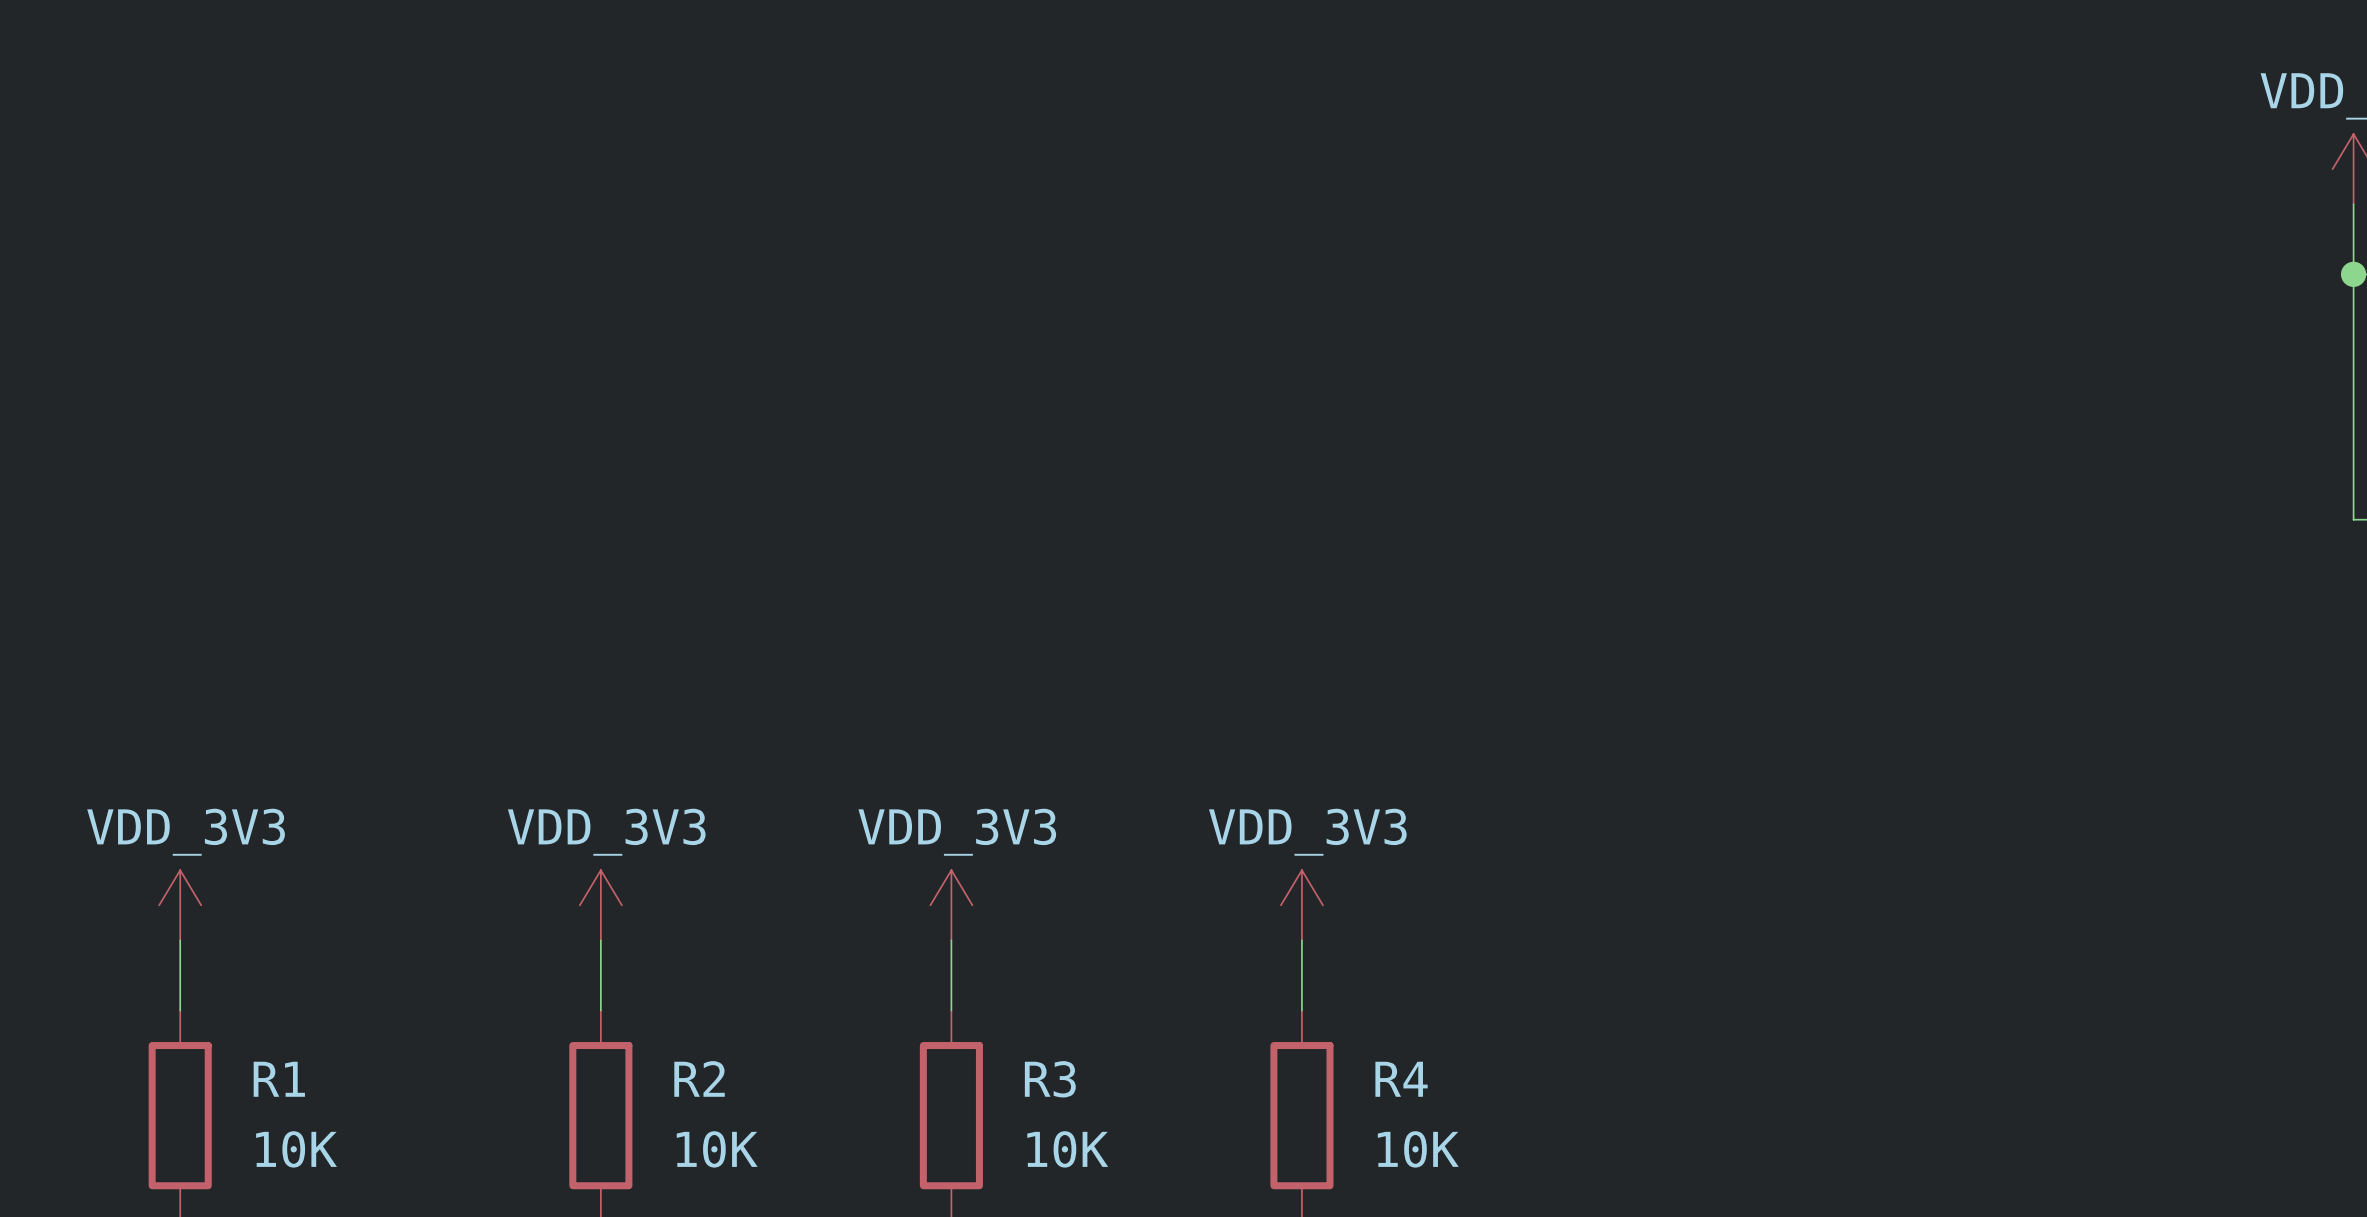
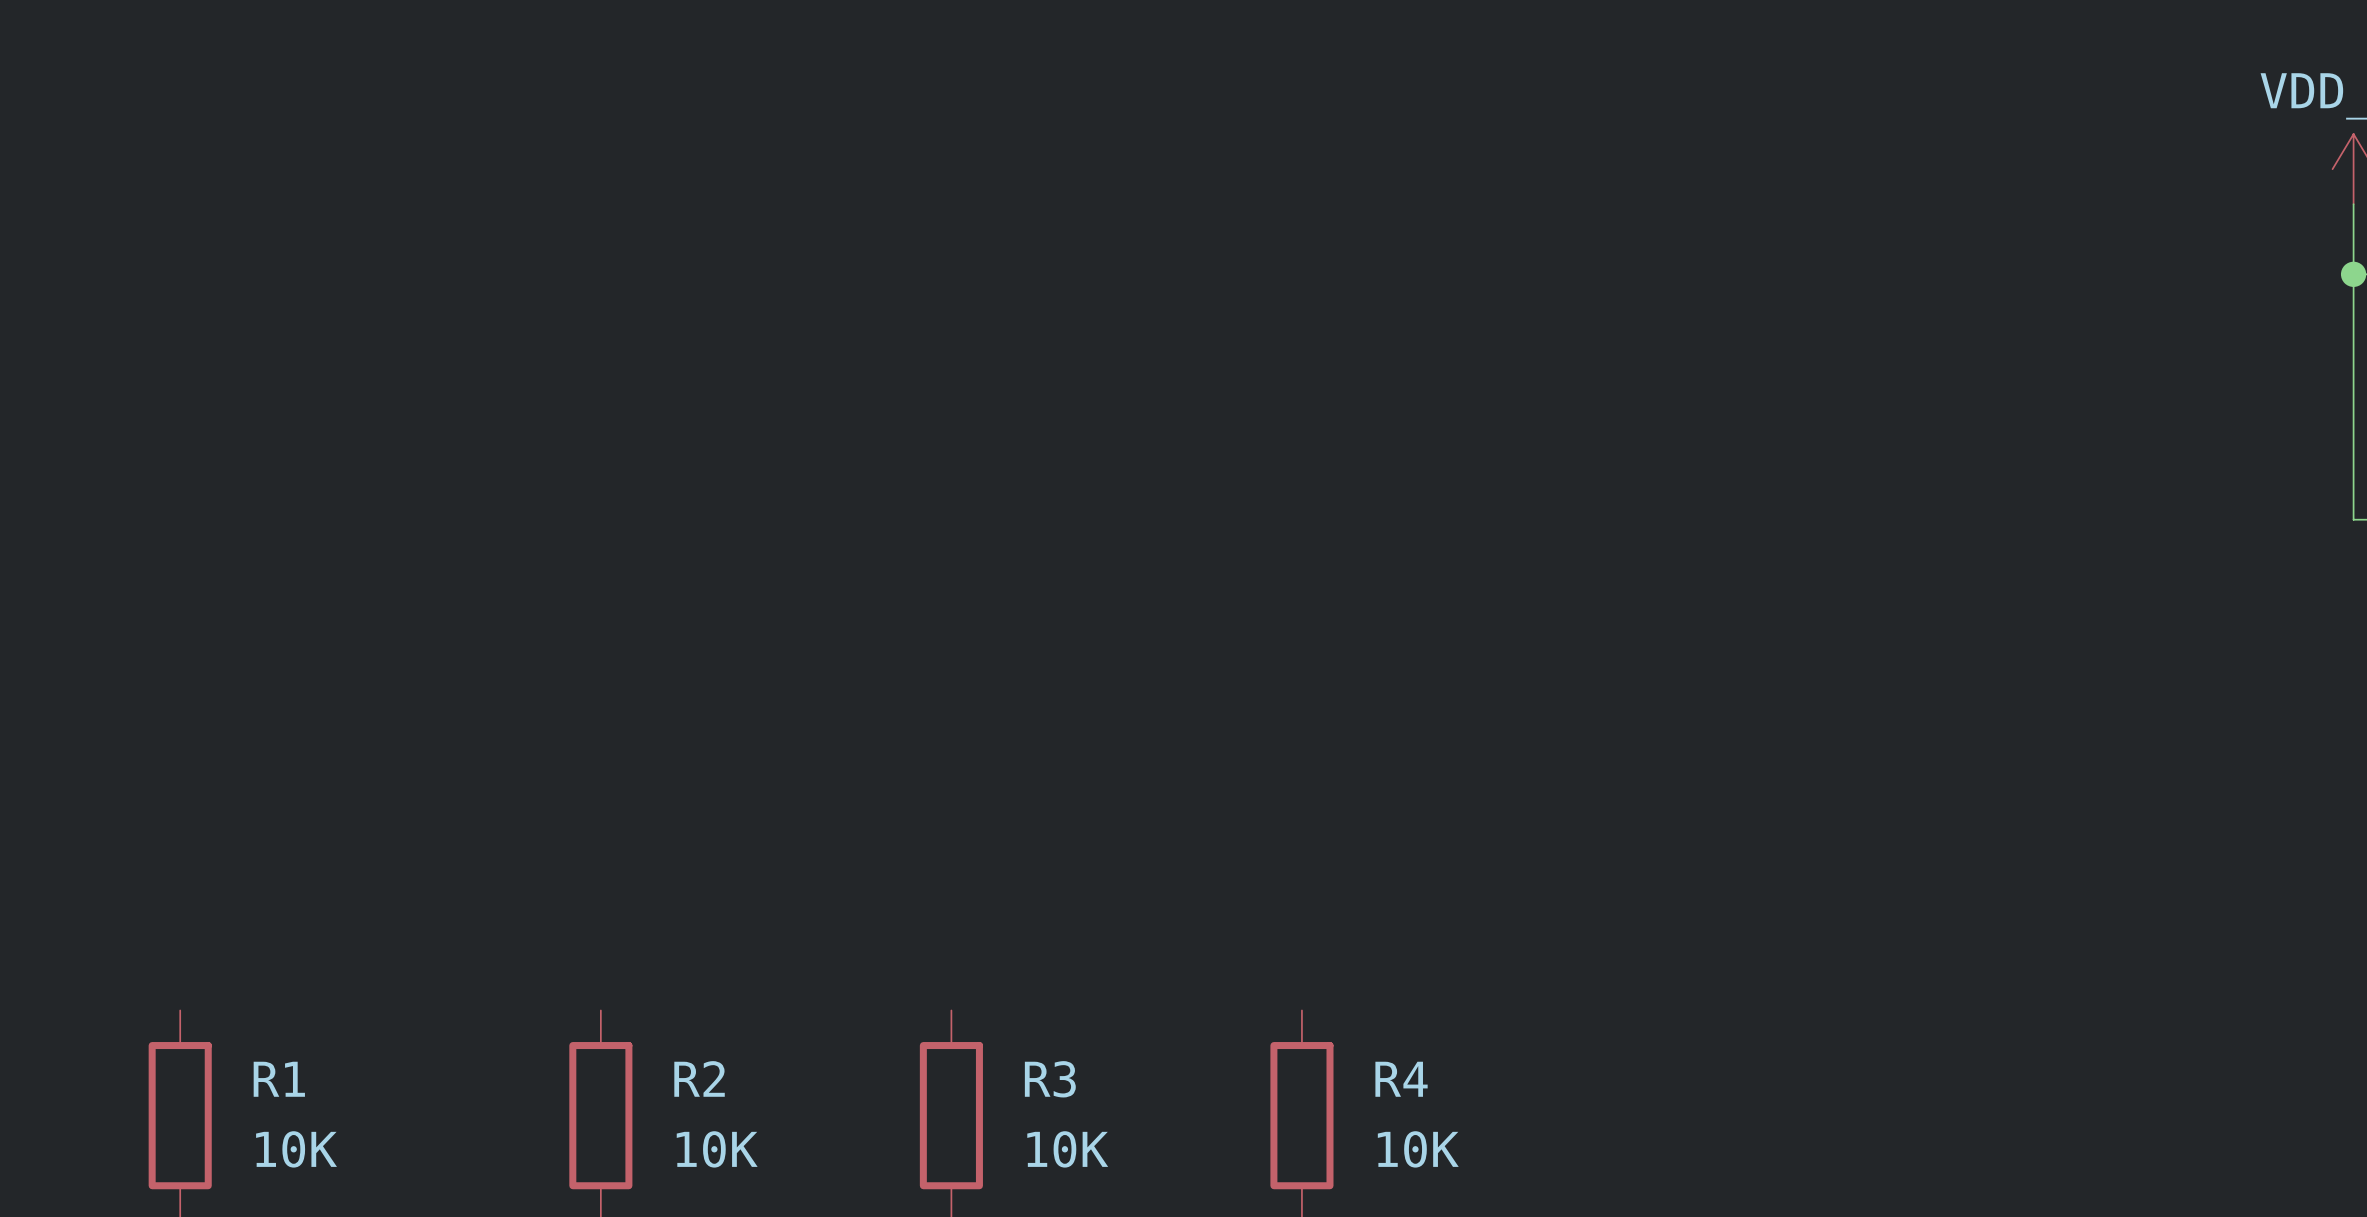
power symbol: VDD_3V3 (180, 905) -> none
power symbol: VDD_3V3 (600, 905) -> none
power symbol: VDD_3V3 (951, 905) -> none
power symbol: VDD_3V3 (1301, 905) -> none
wire: (180, 940) (180, 1010) -> none
wire: (600, 940) (600, 1010) -> none
wire: (951, 940) (951, 1010) -> none
wire: (1301, 940) (1301, 1010) -> none

